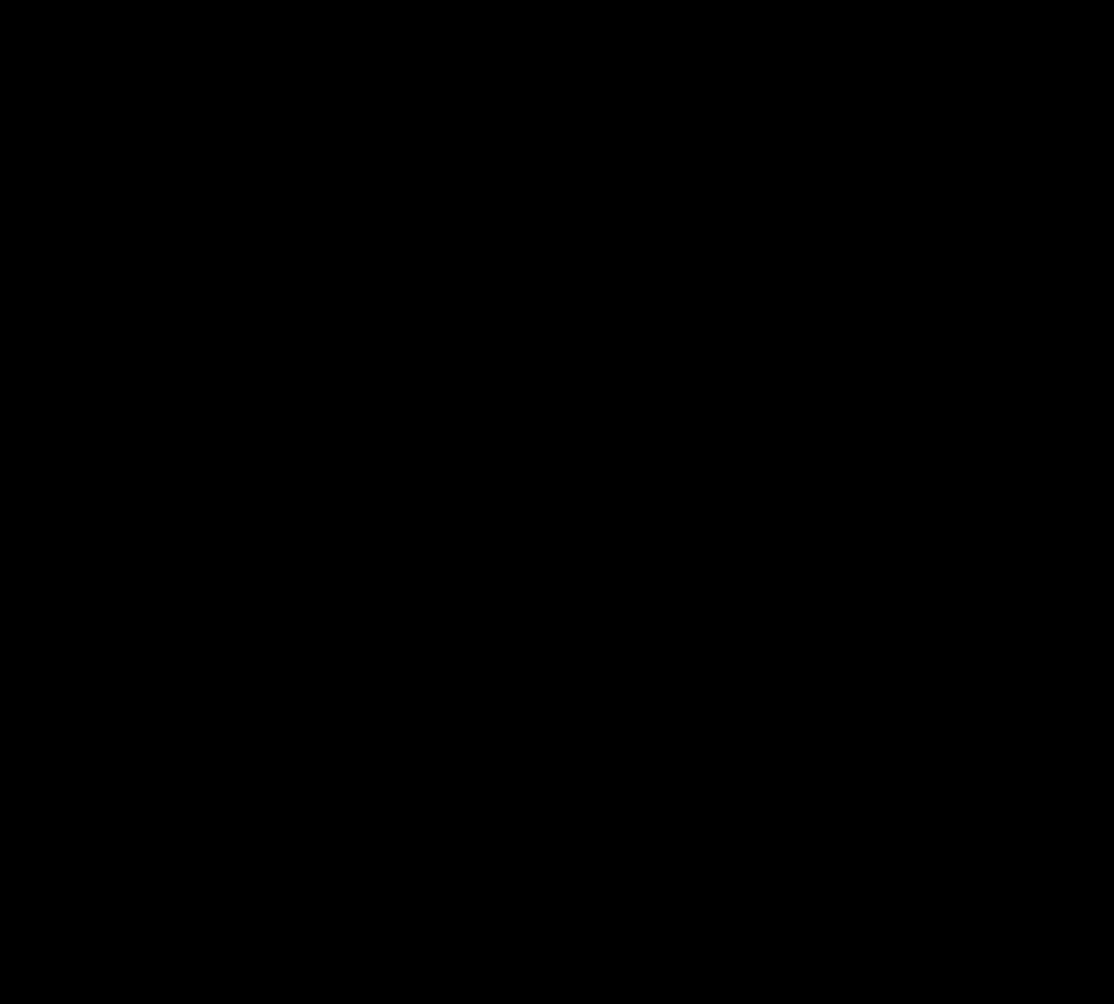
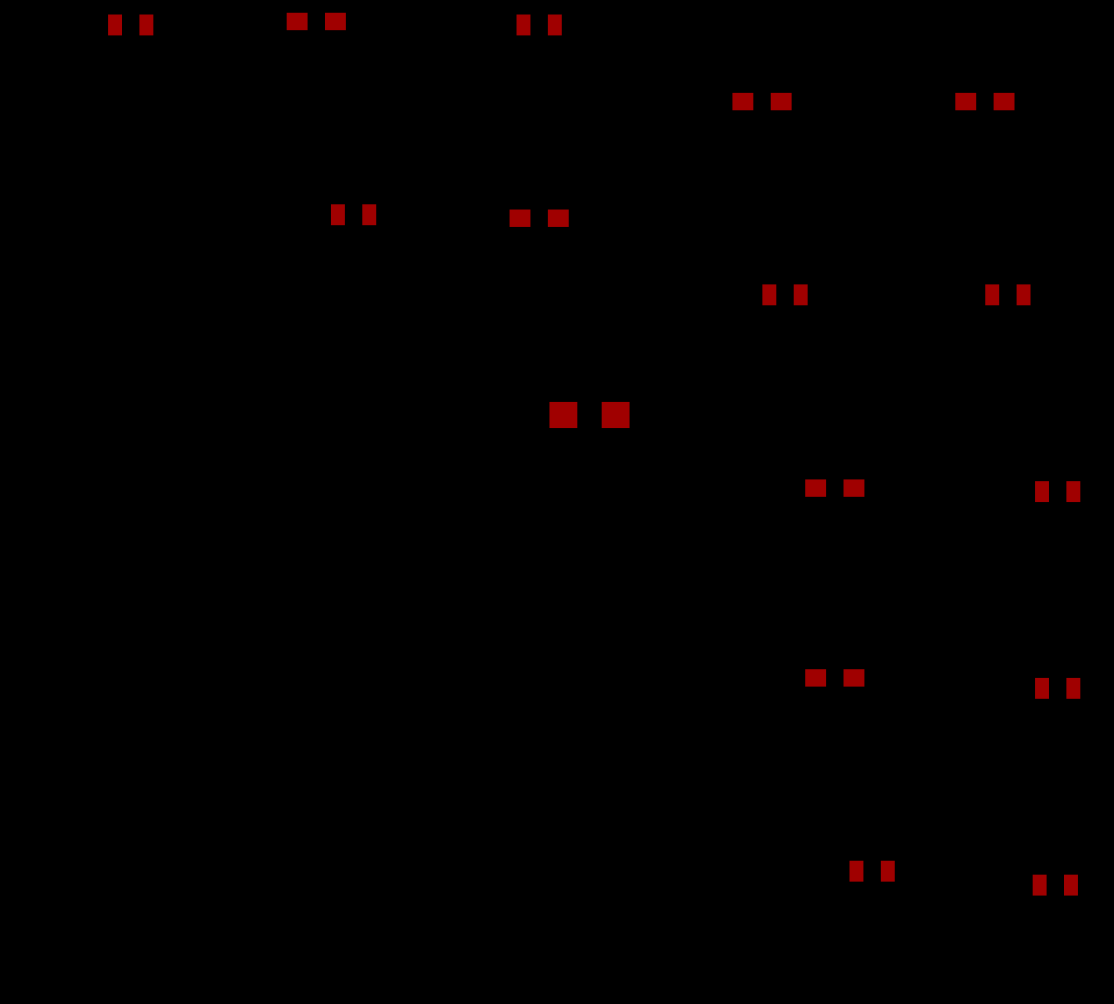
part: none -> (316, 21)
part: none -> (130, 24)
part: none -> (539, 24)
part: none -> (762, 101)
part: none -> (984, 101)
part: none -> (353, 214)
part: none -> (539, 218)
part: none -> (785, 294)
part: none -> (1007, 294)
part: none -> (589, 414)
part: none -> (834, 488)
part: none -> (1057, 491)
part: none -> (834, 677)
part: none -> (1057, 688)
part: none -> (872, 871)
part: none -> (1055, 885)

